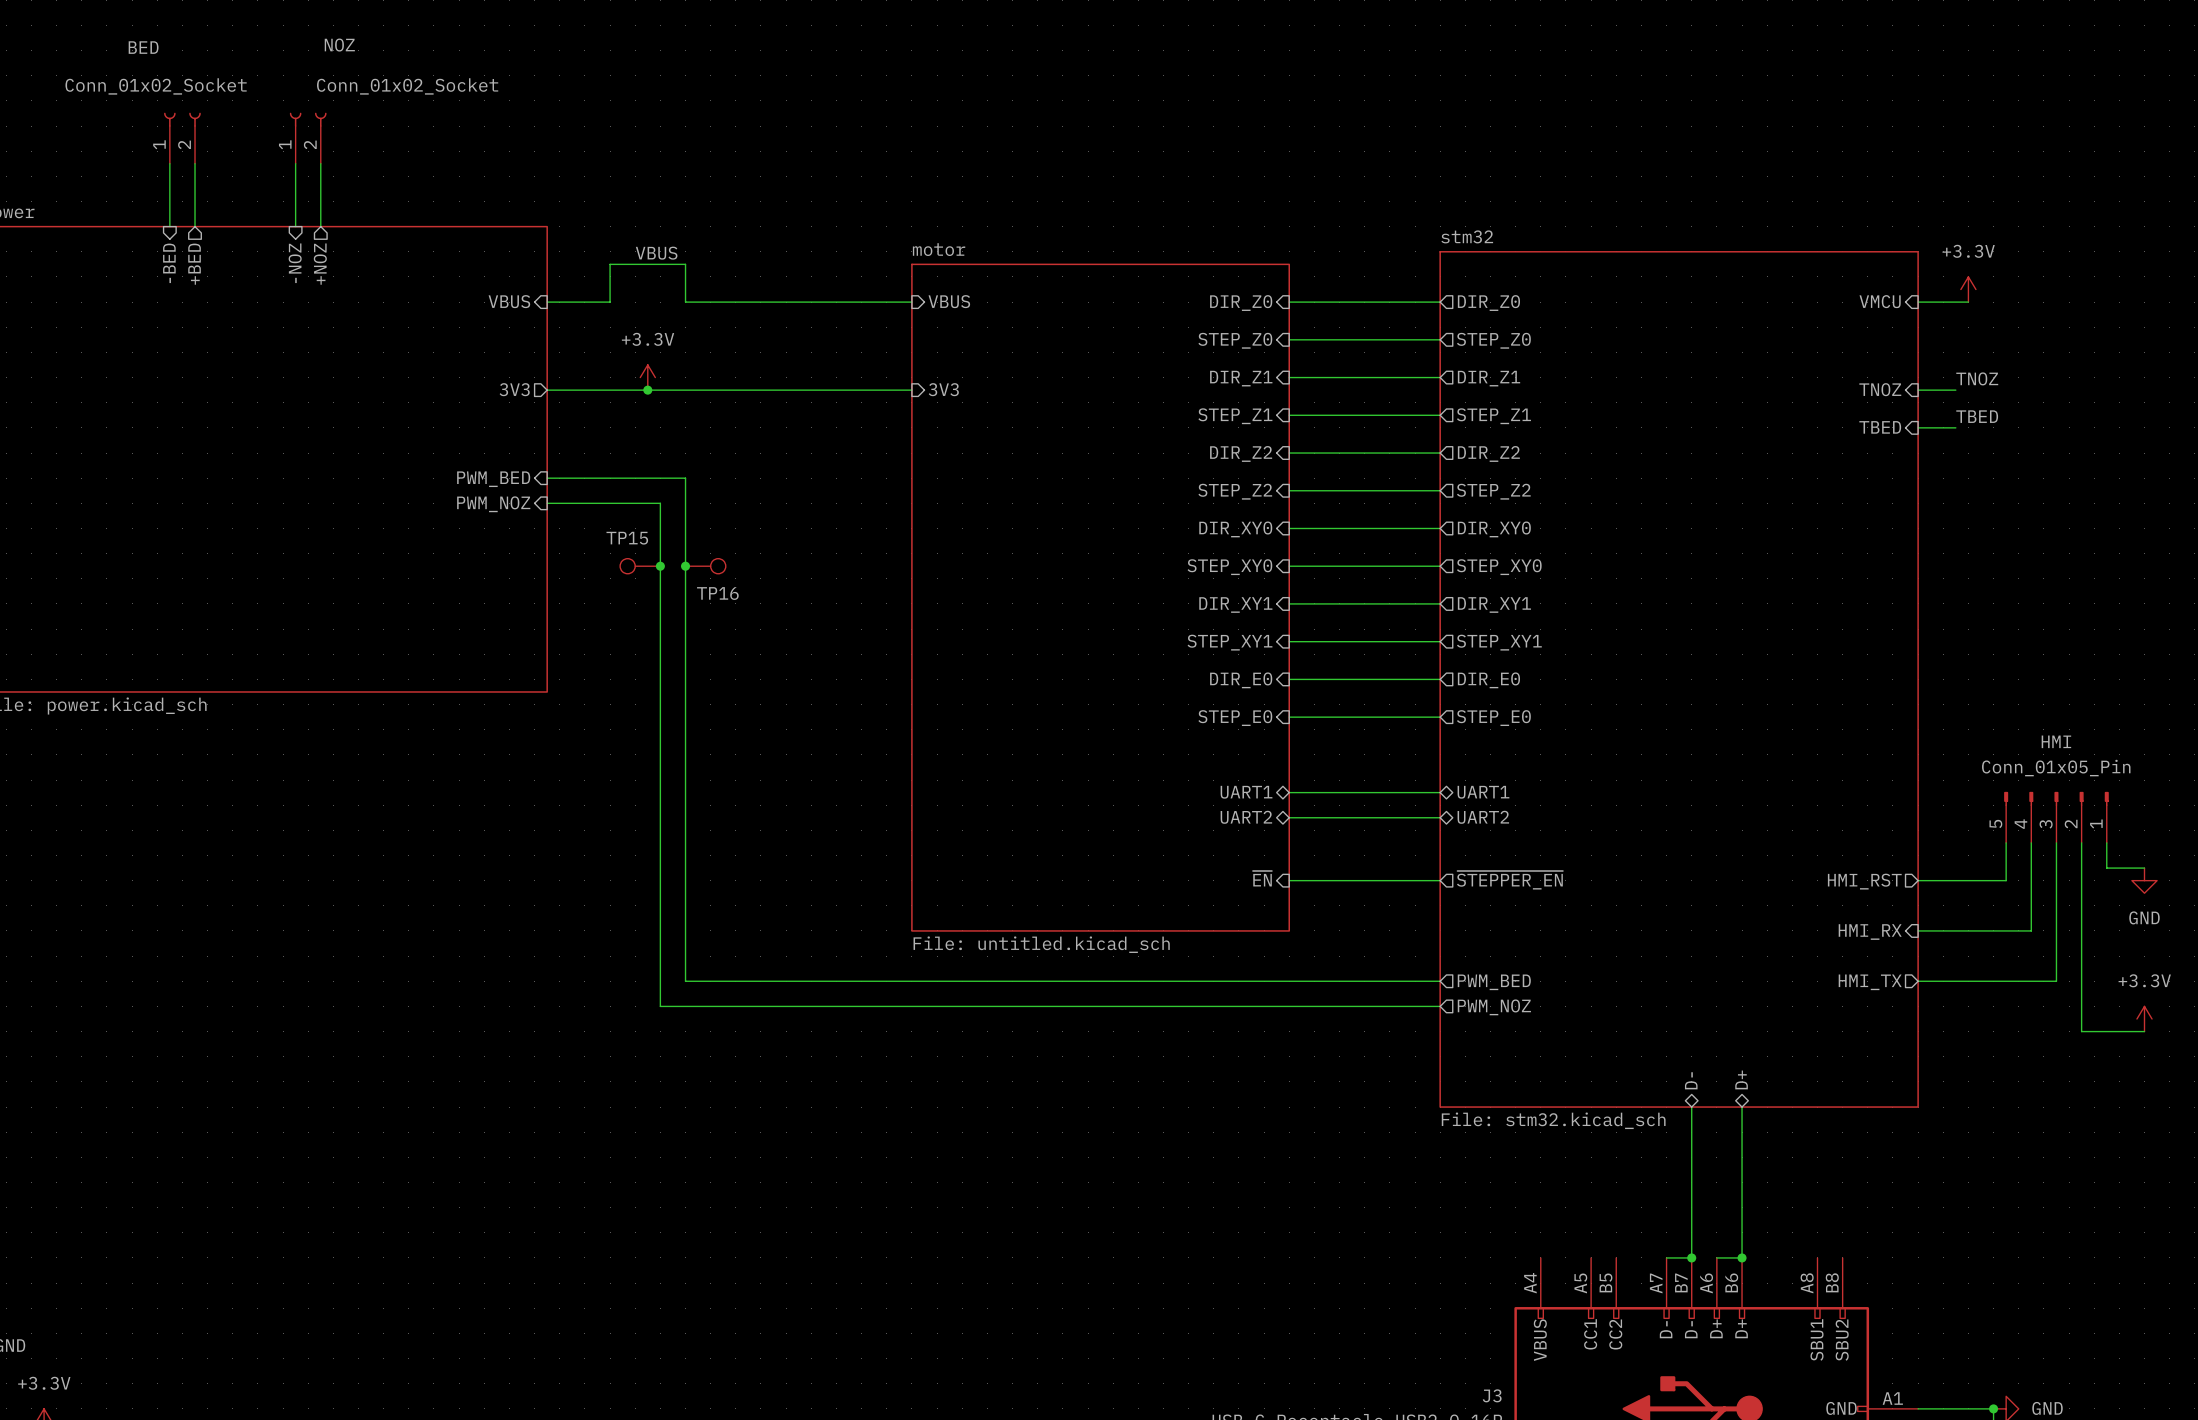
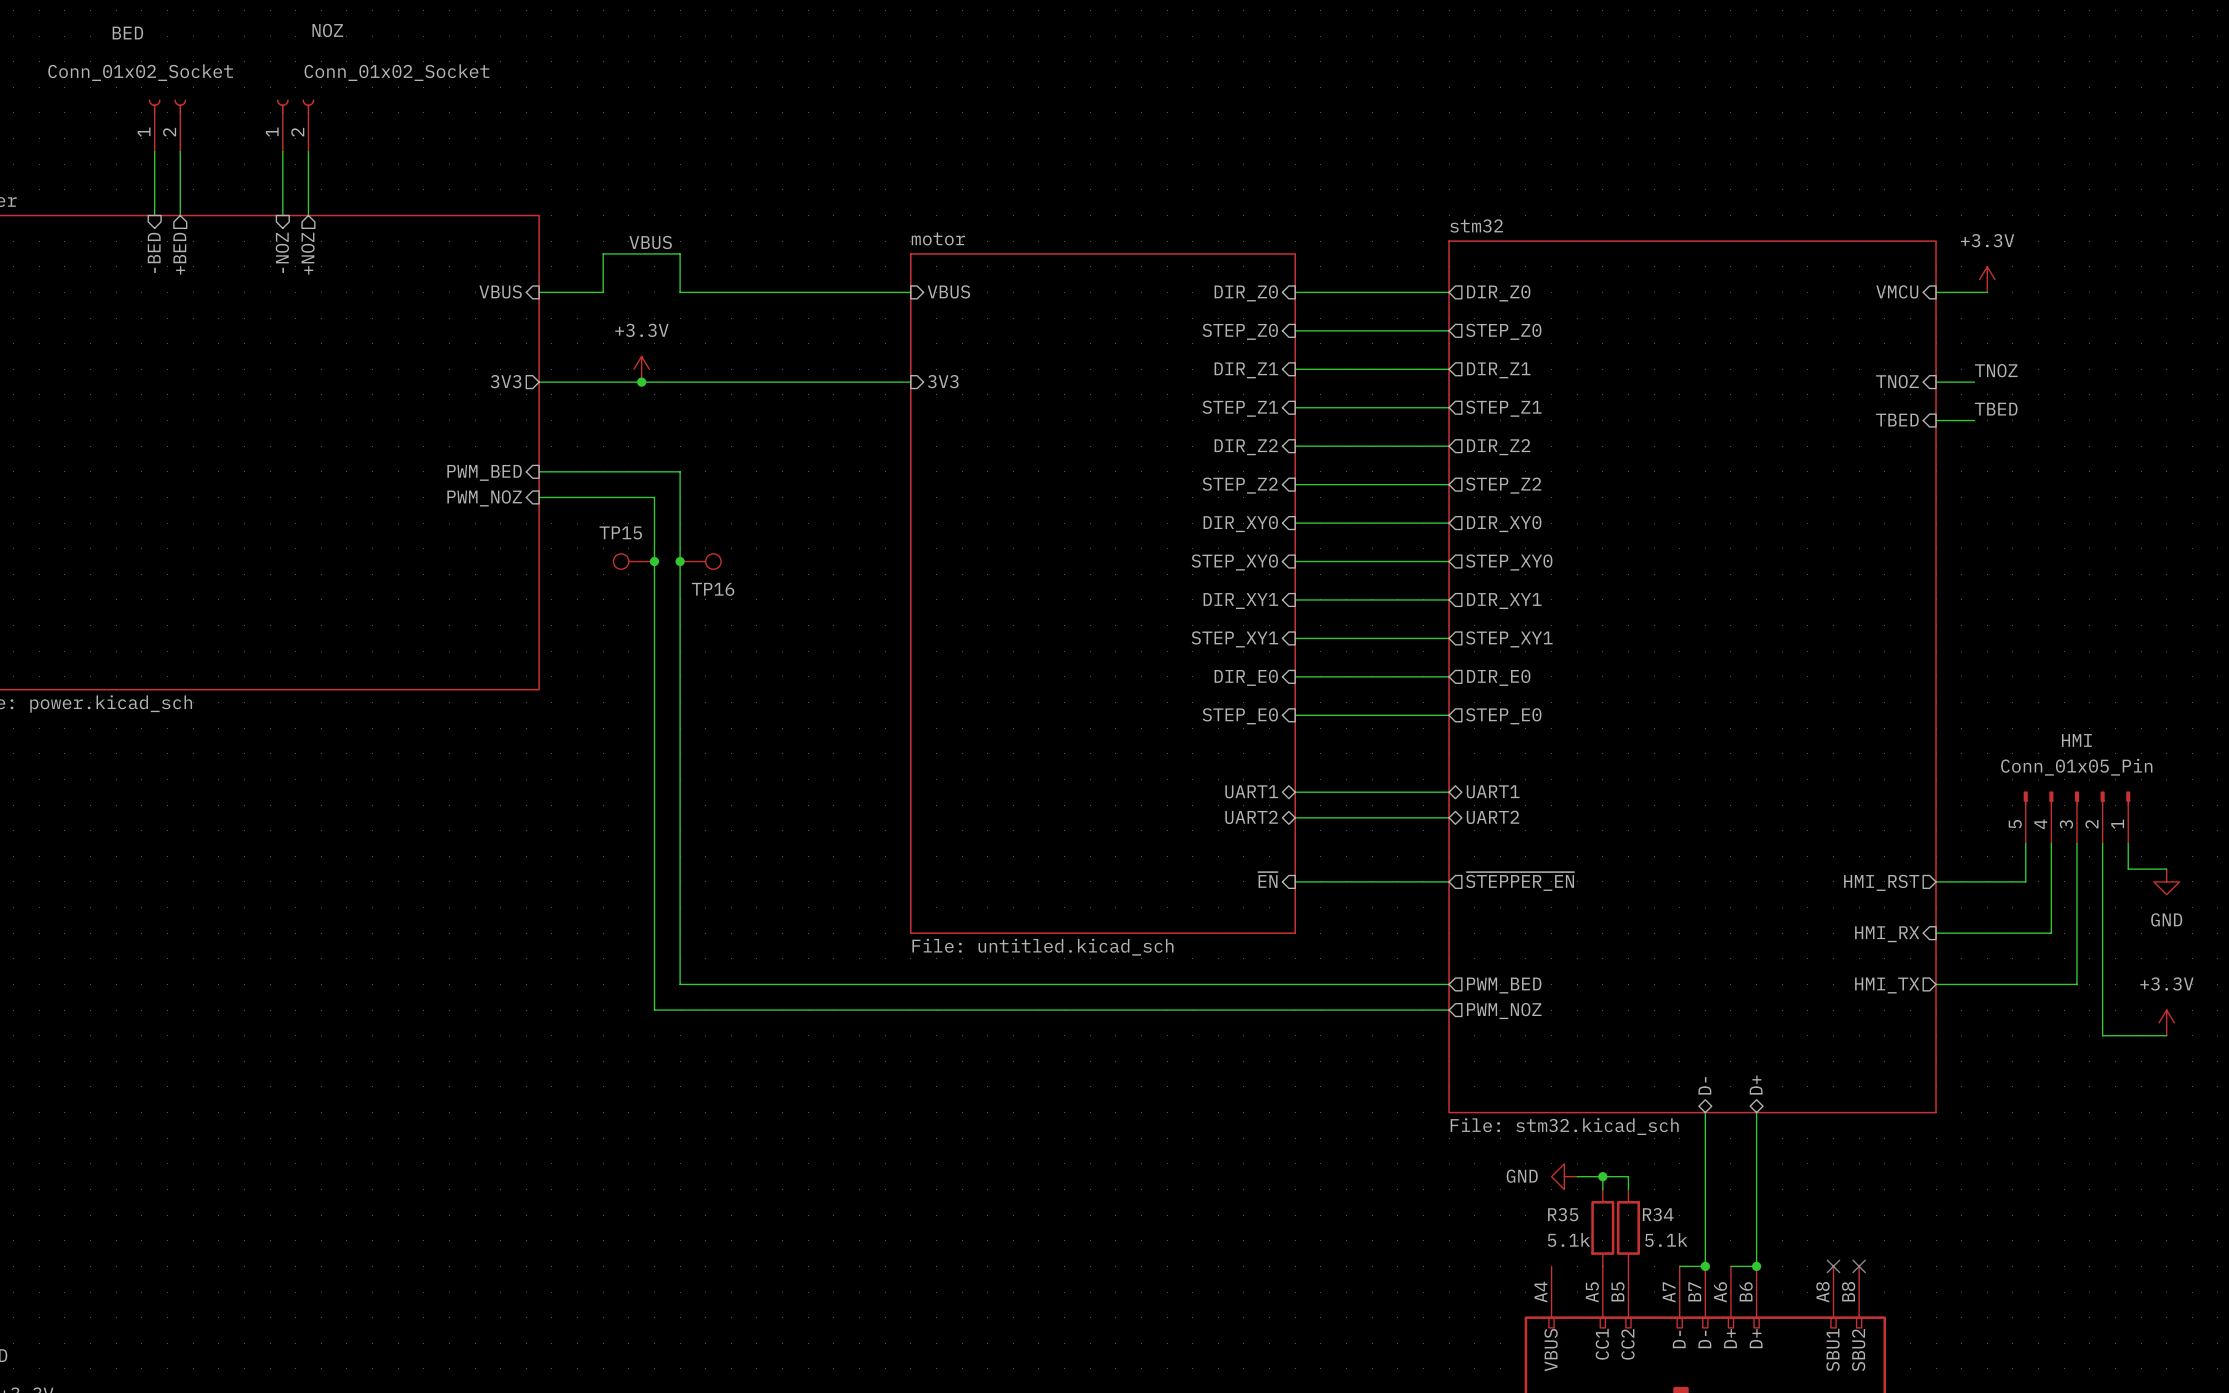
power symbol: none -> GND (1564, 1176)
wire: none -> (1577, 1176) (1628, 1176) (1628, 1189)
wire: none -> (1602, 1176) (1602, 1189)
junction: none -> (1602, 1176)
R35: none -> 5.1k (1602, 1227)
R34: none -> 5.1k (1628, 1227)
no-connect mark: none -> (1833, 1266)
no-connect mark: none -> (1859, 1266)

